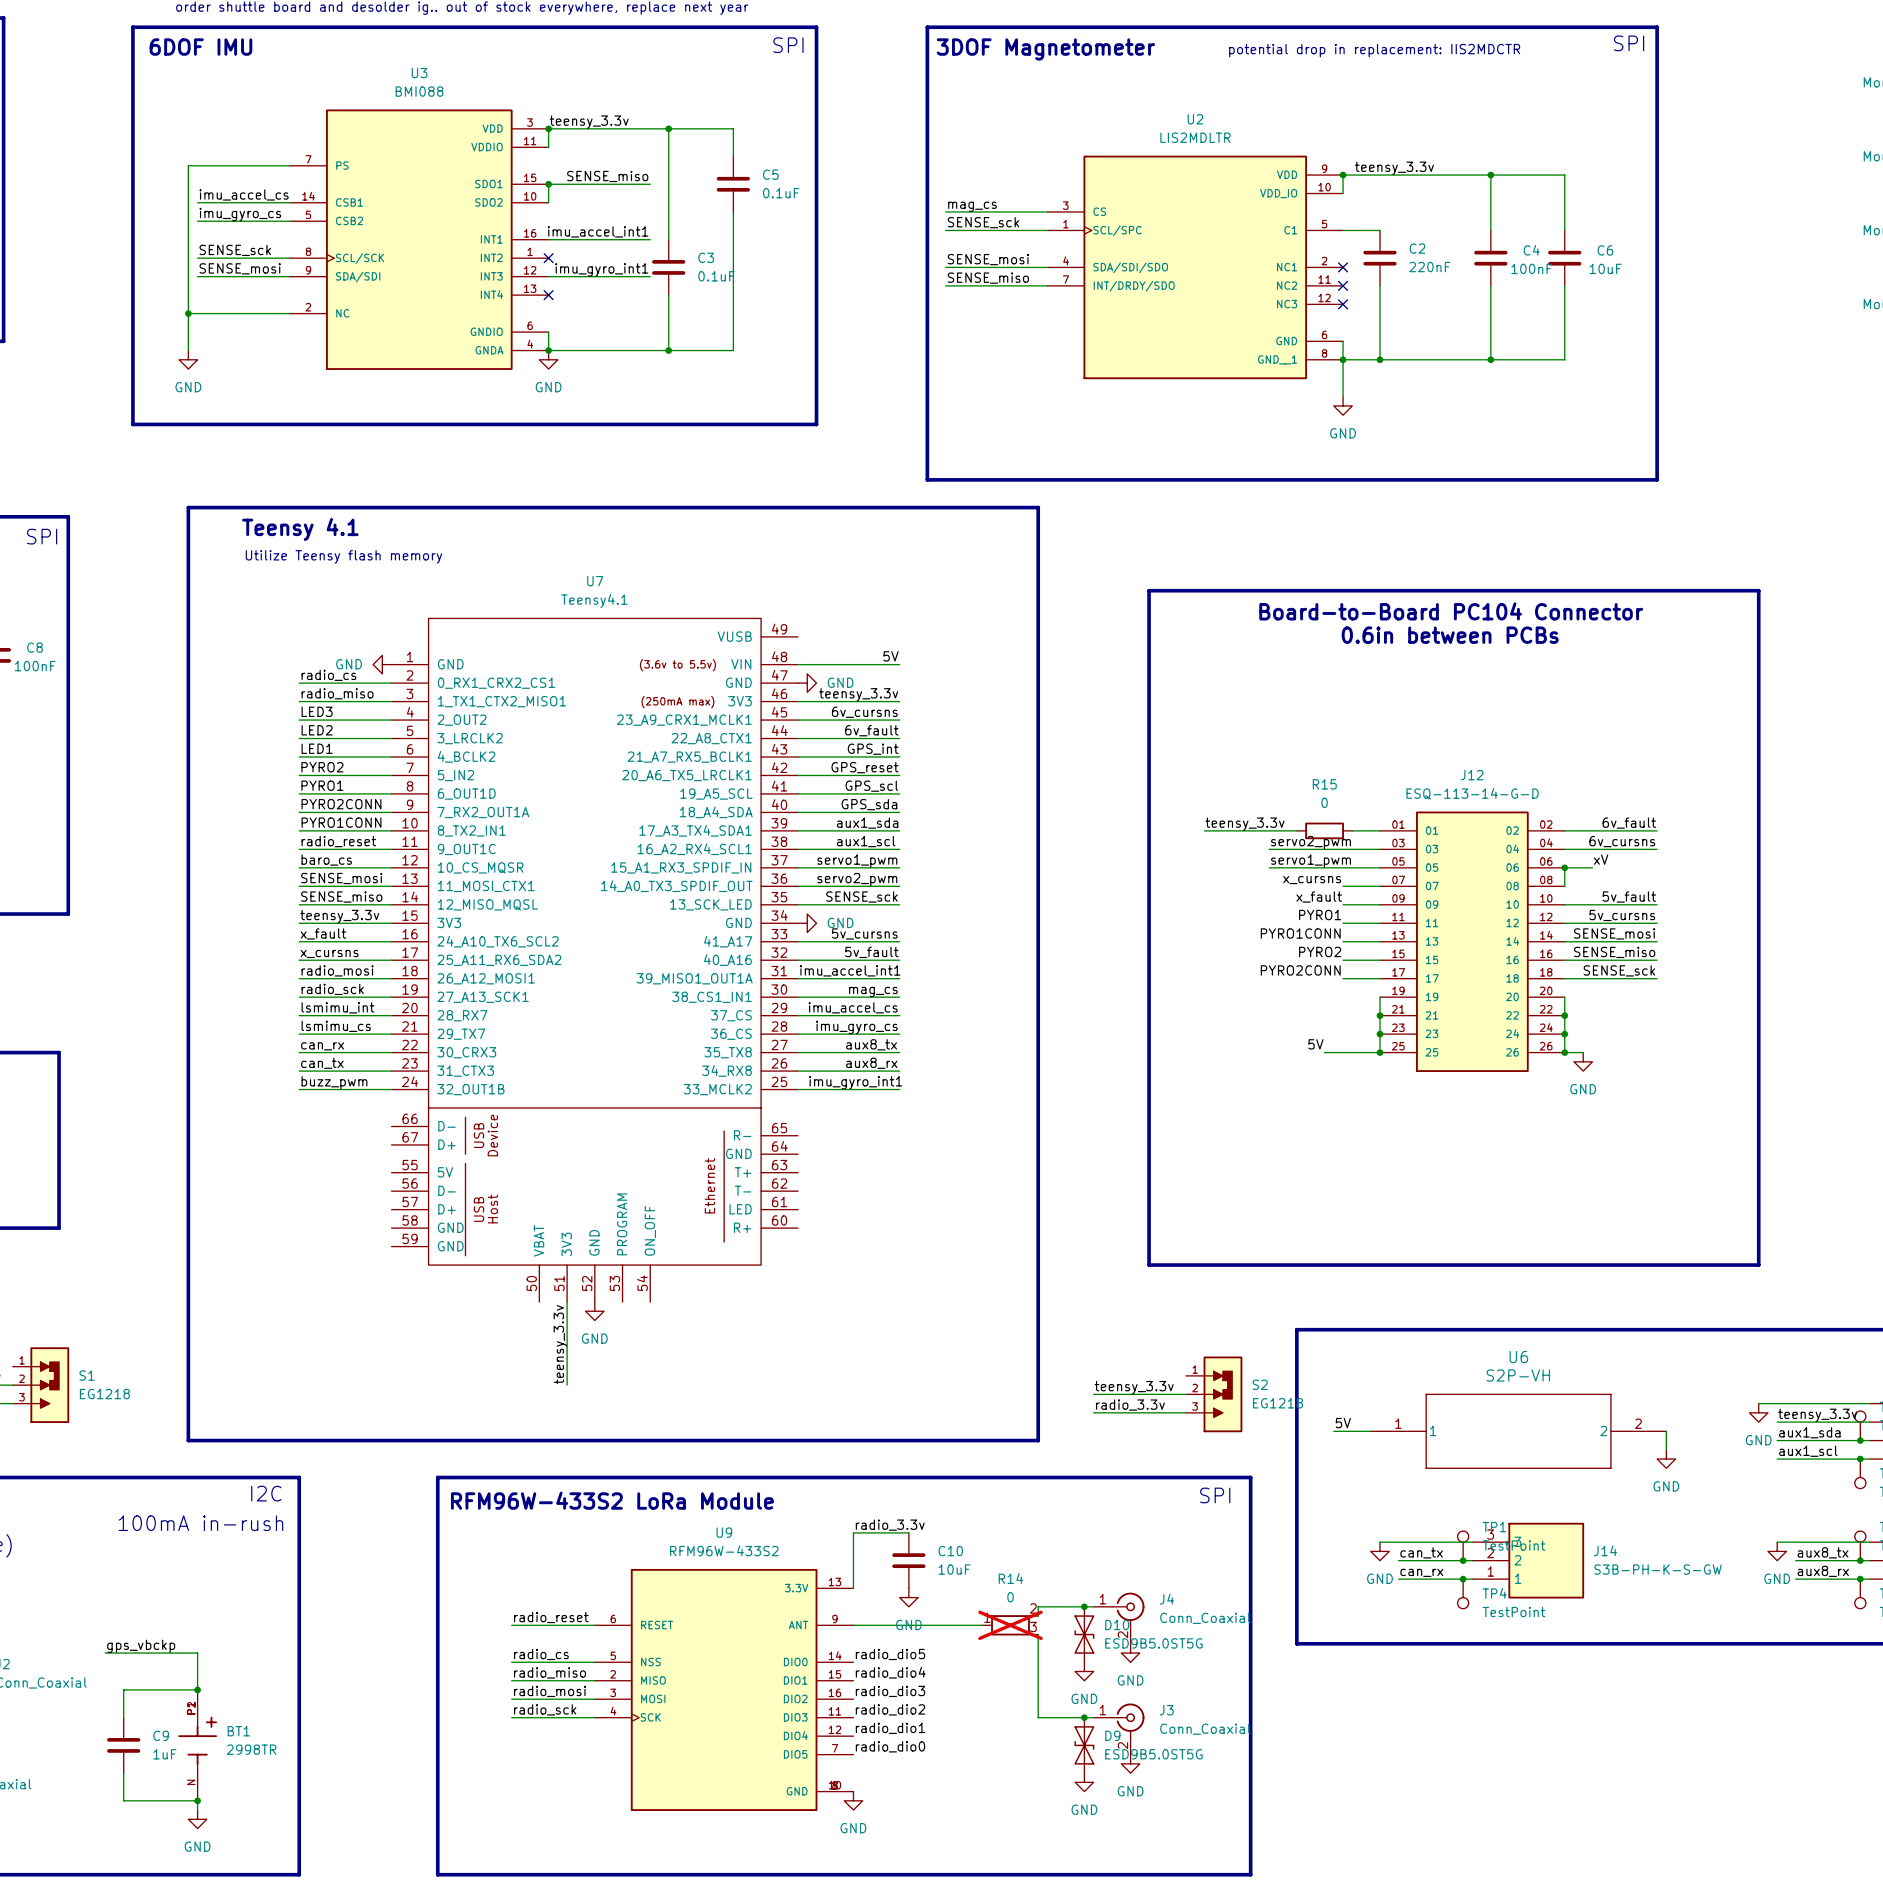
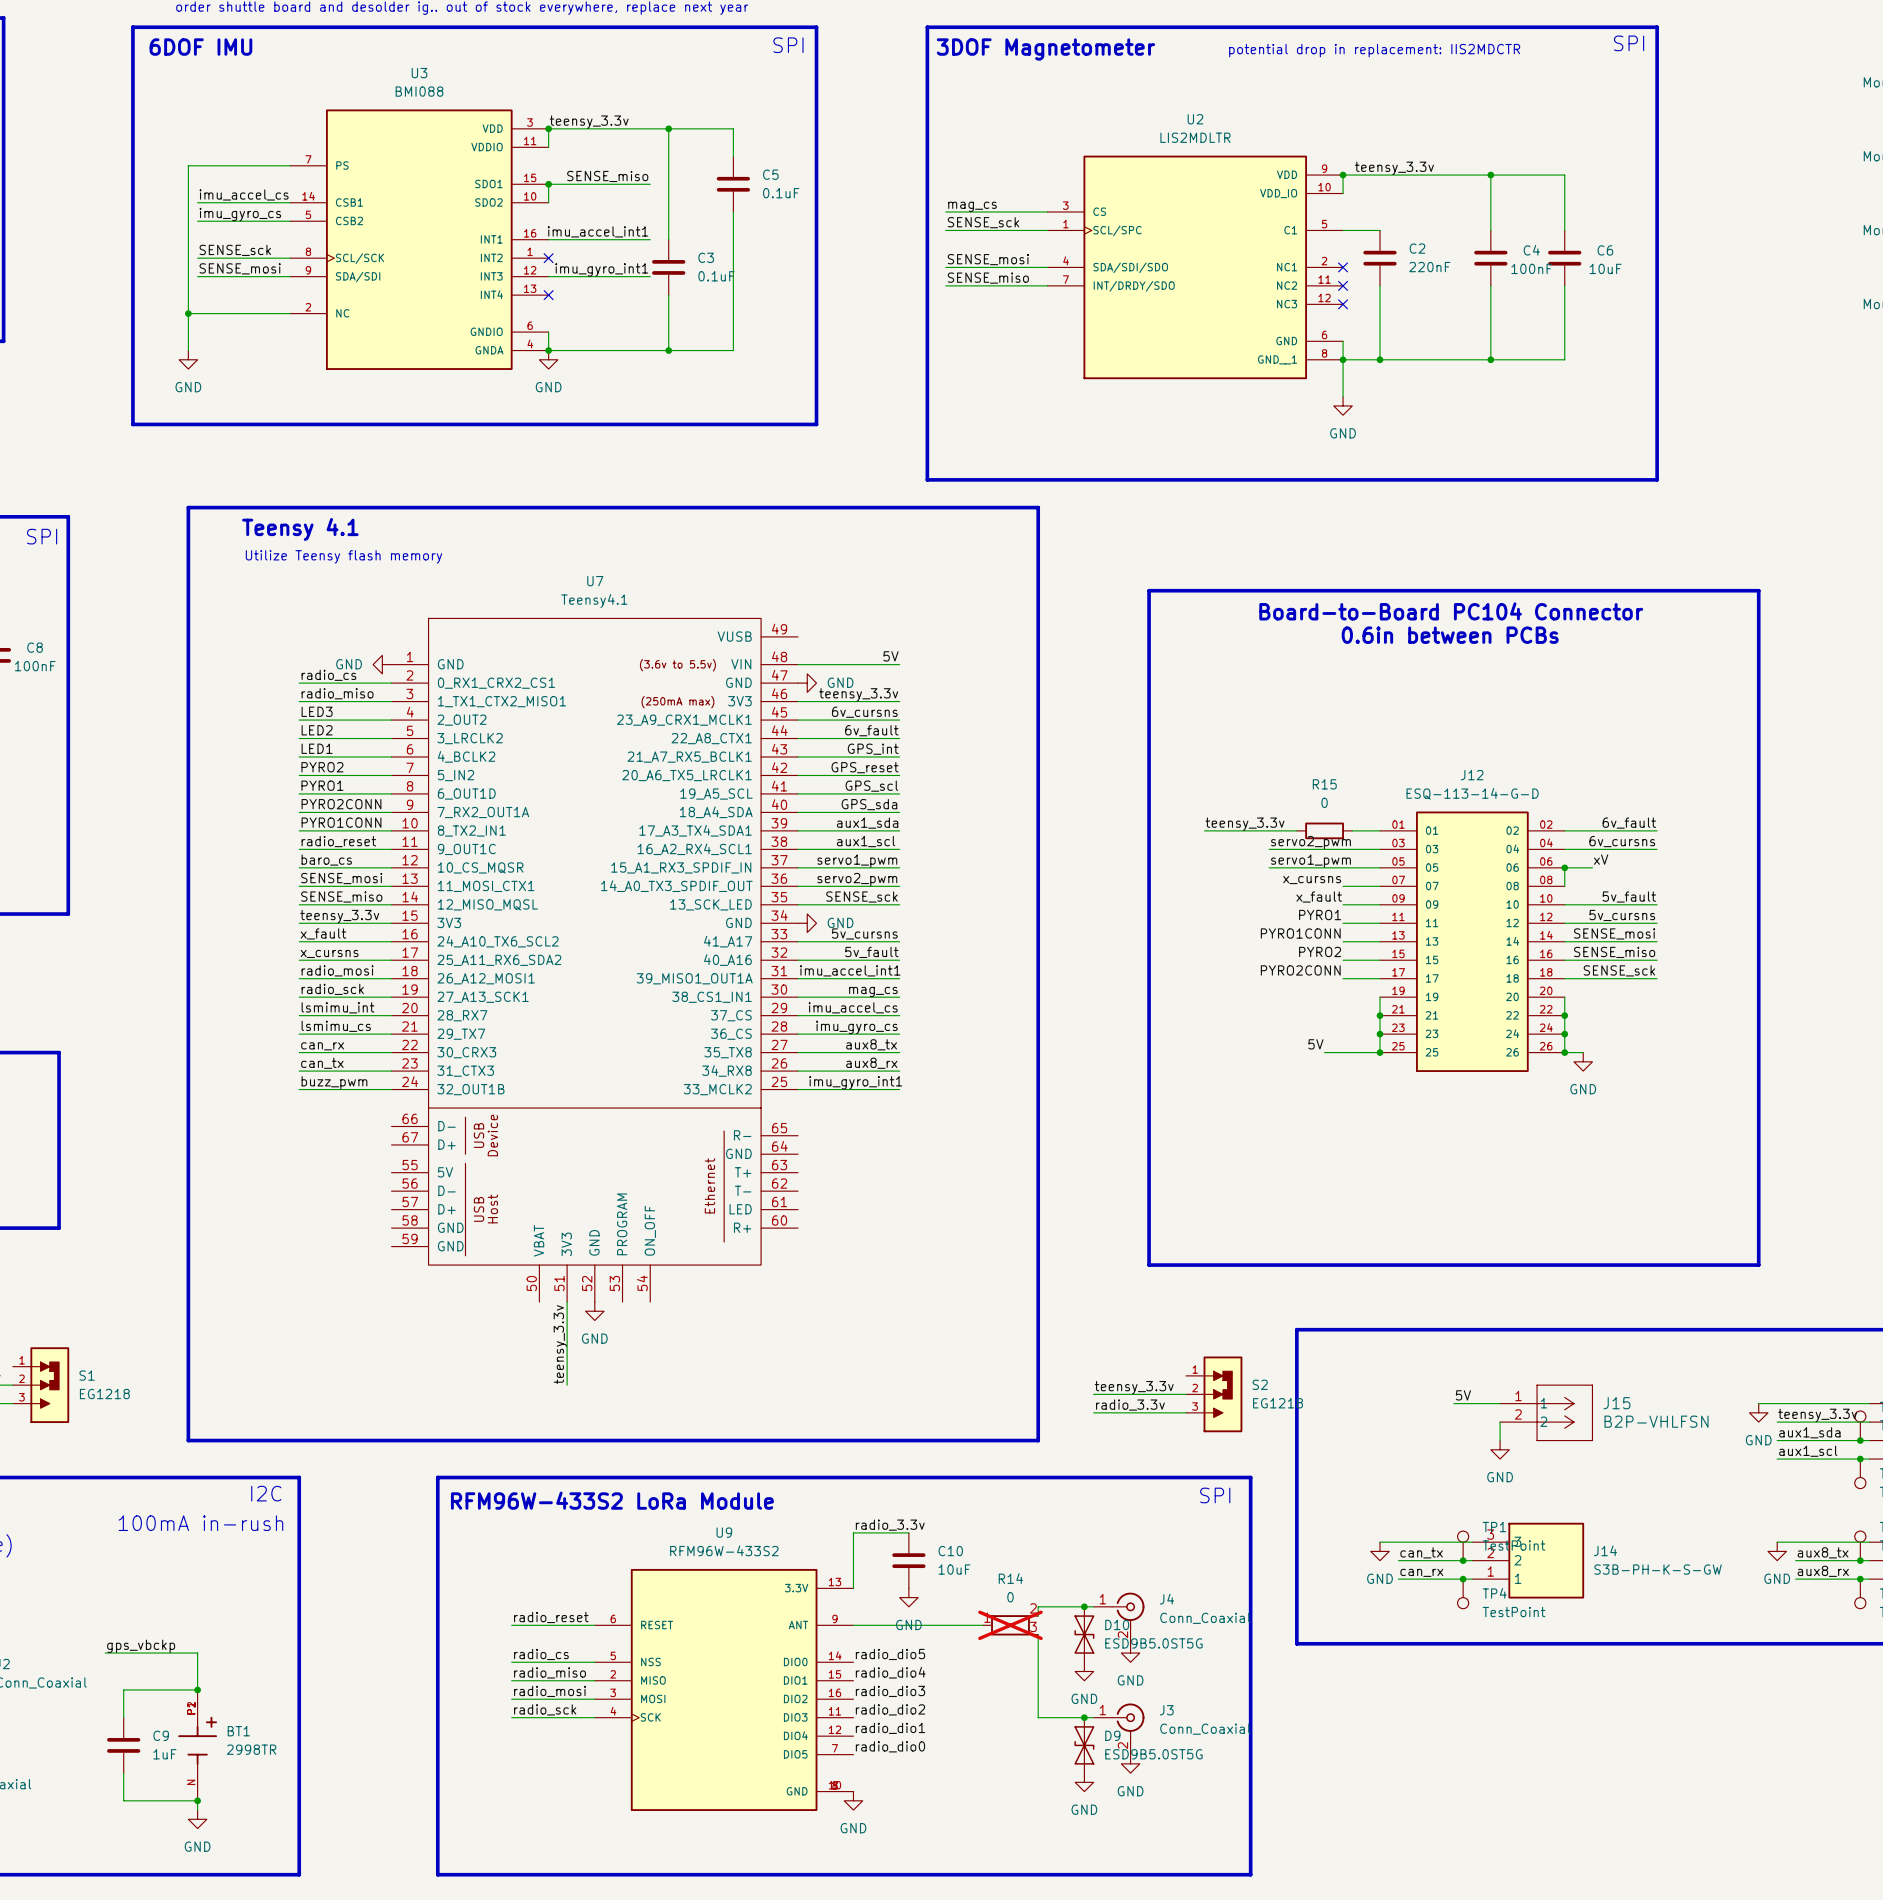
wire: none -> (1453, 1403) (1500, 1403)
J15: none -> B2P-VHLFSN (1546, 1412)
label position: 5V (1343, 1423) -> 5V (1463, 1395)
wire: (1333, 1431) (1370, 1431) -> none
U6: S2P-VH (1518, 1431) -> none
wire: (1666, 1431) (1666, 1449) -> (1500, 1422) (1500, 1440)
power symbol position: GND (1666, 1459) -> GND (1500, 1449)

